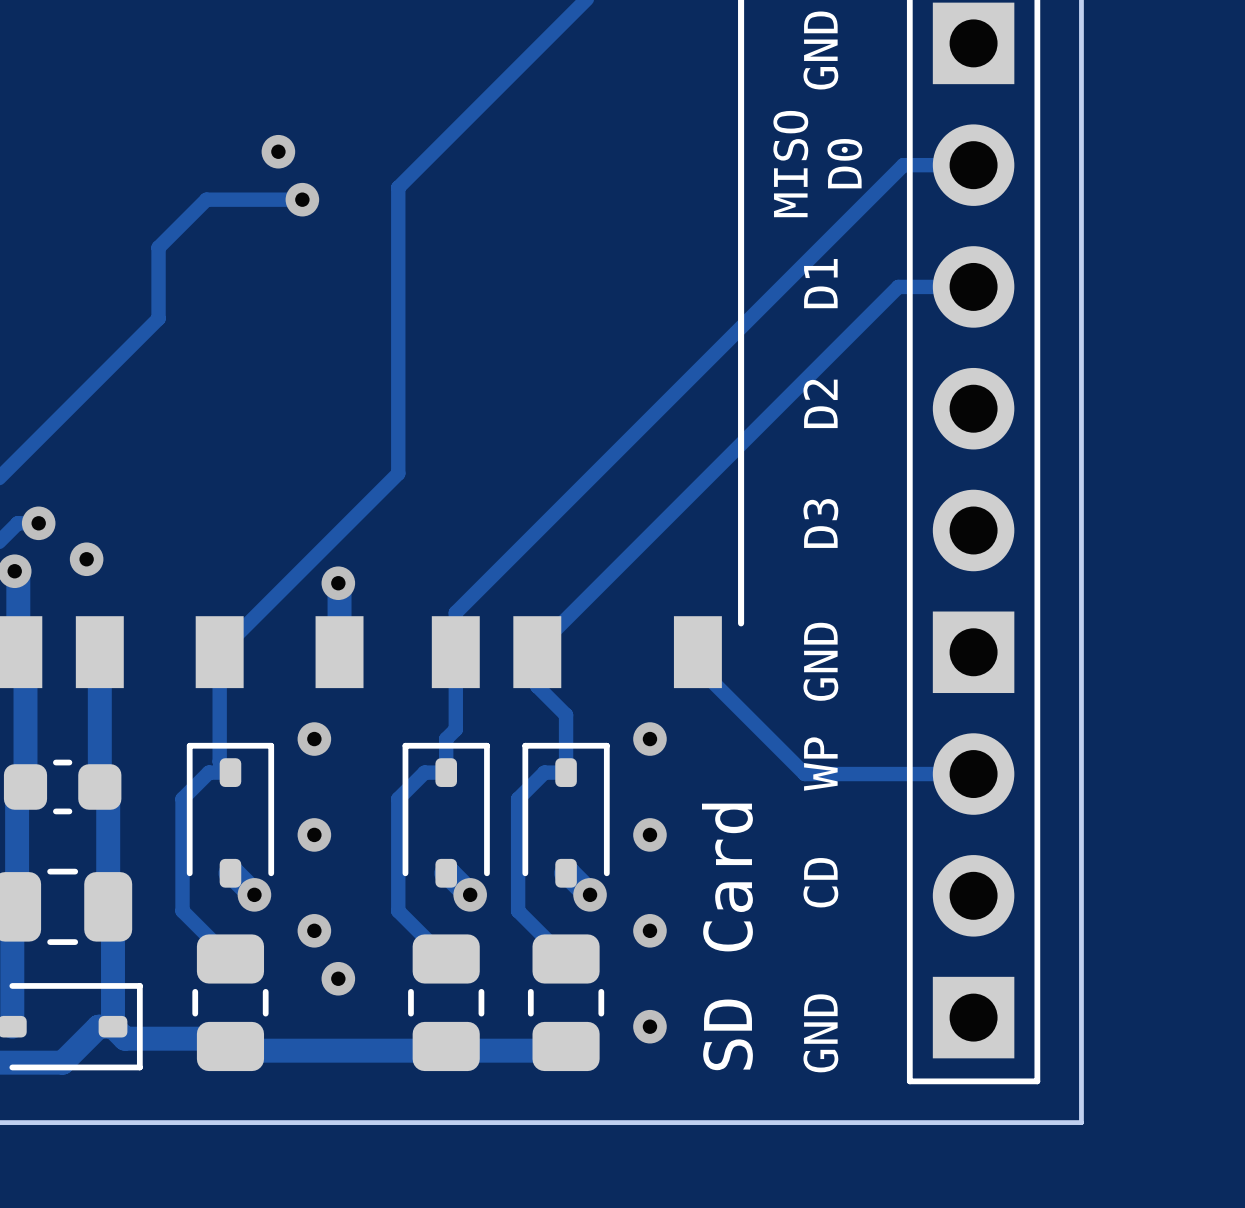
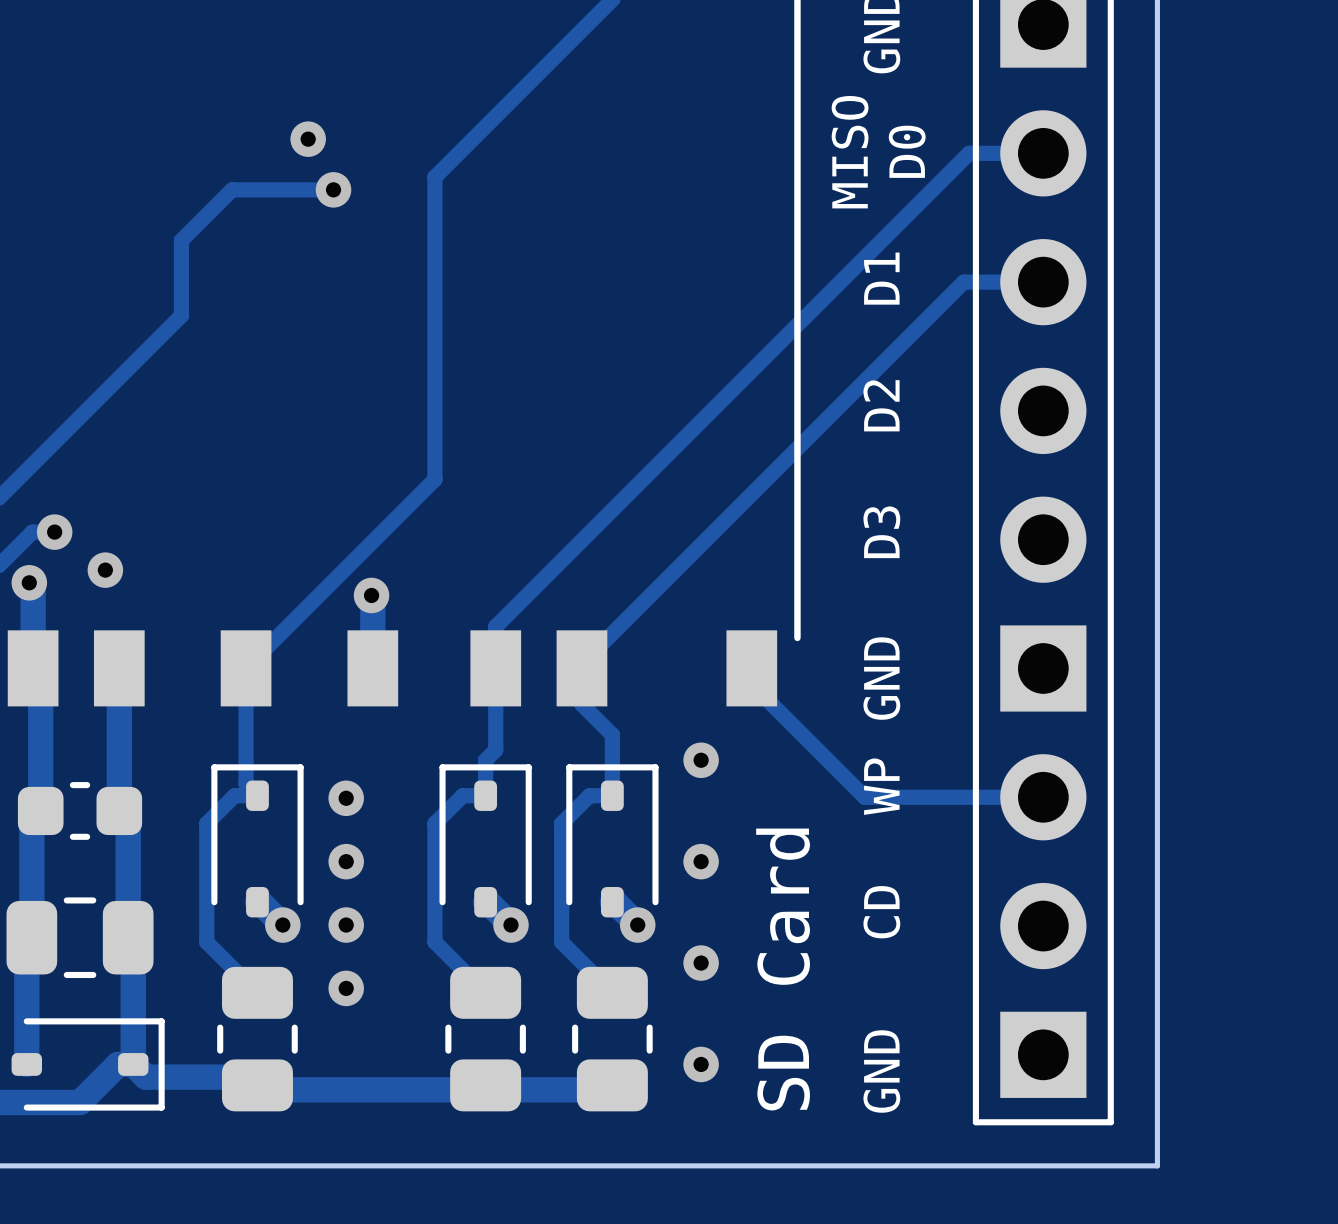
via position: (314, 739) -> (346, 798)
via: none -> (346, 925)
via: (314, 930) -> none
via: none -> (346, 988)
via: (338, 978) -> none

